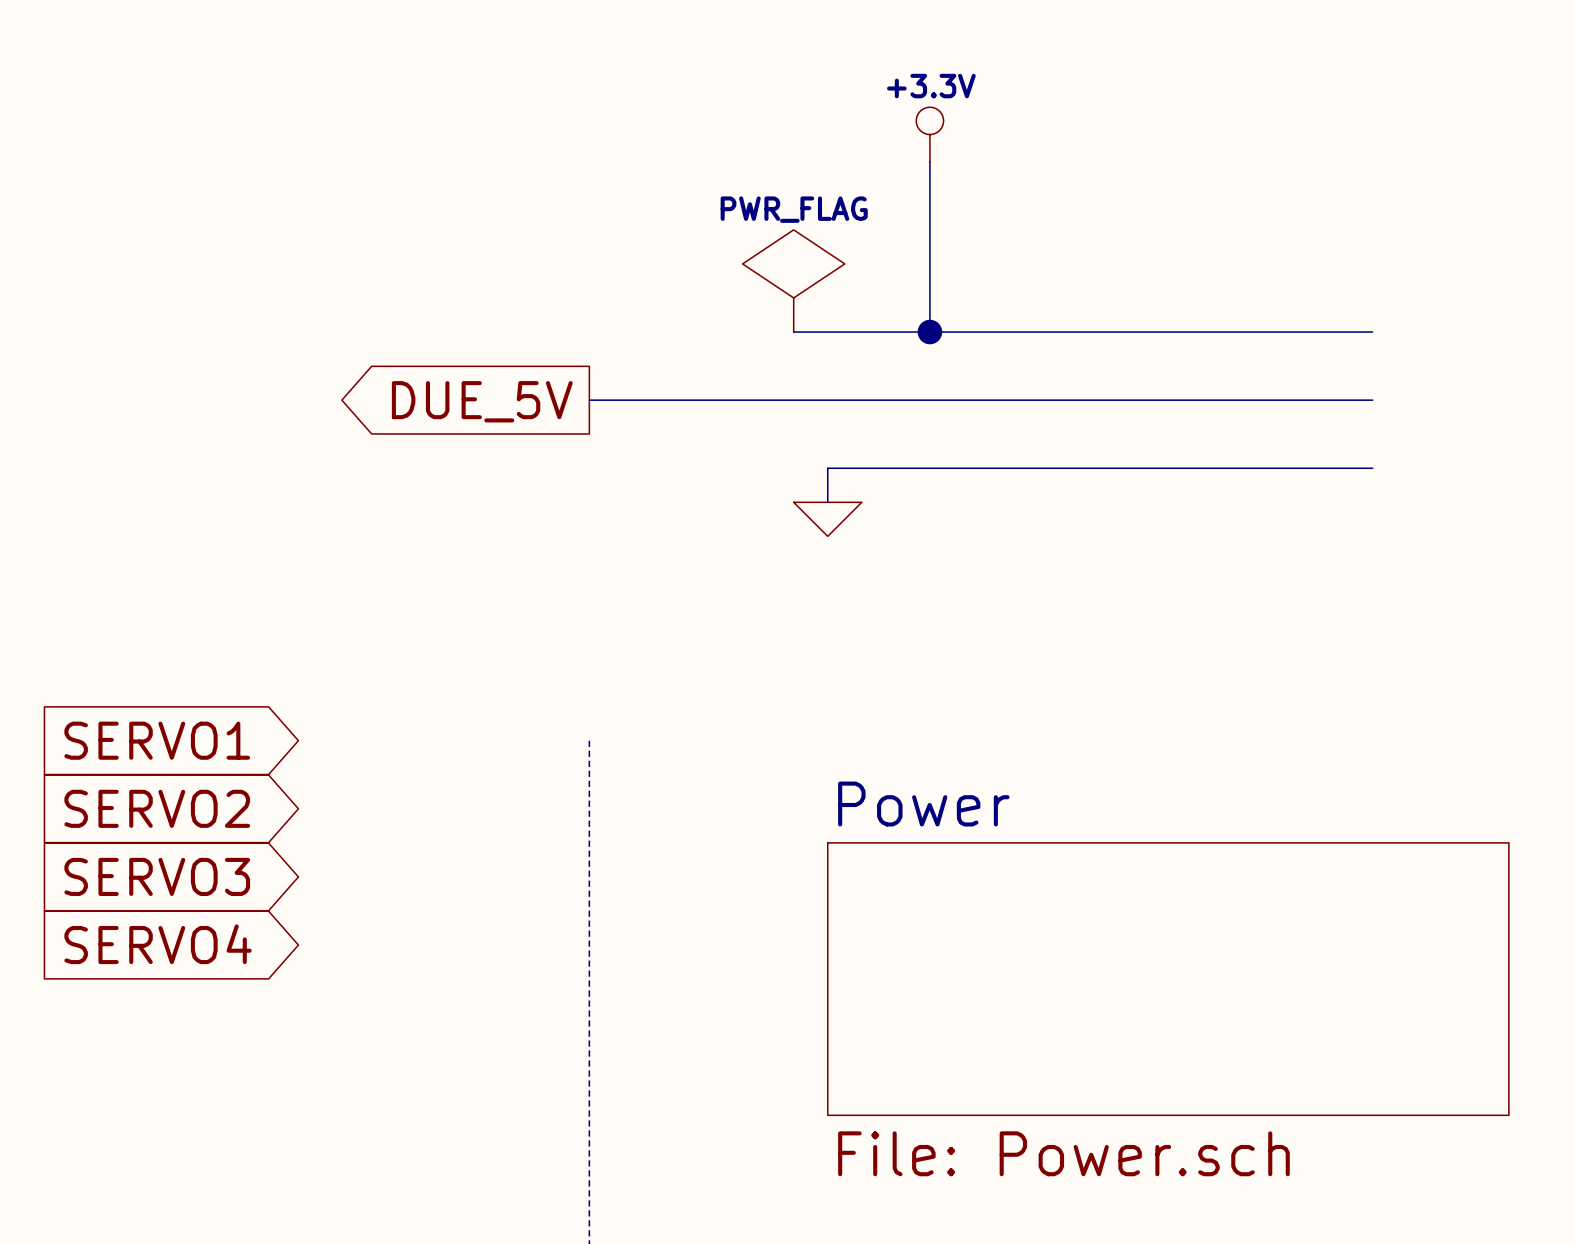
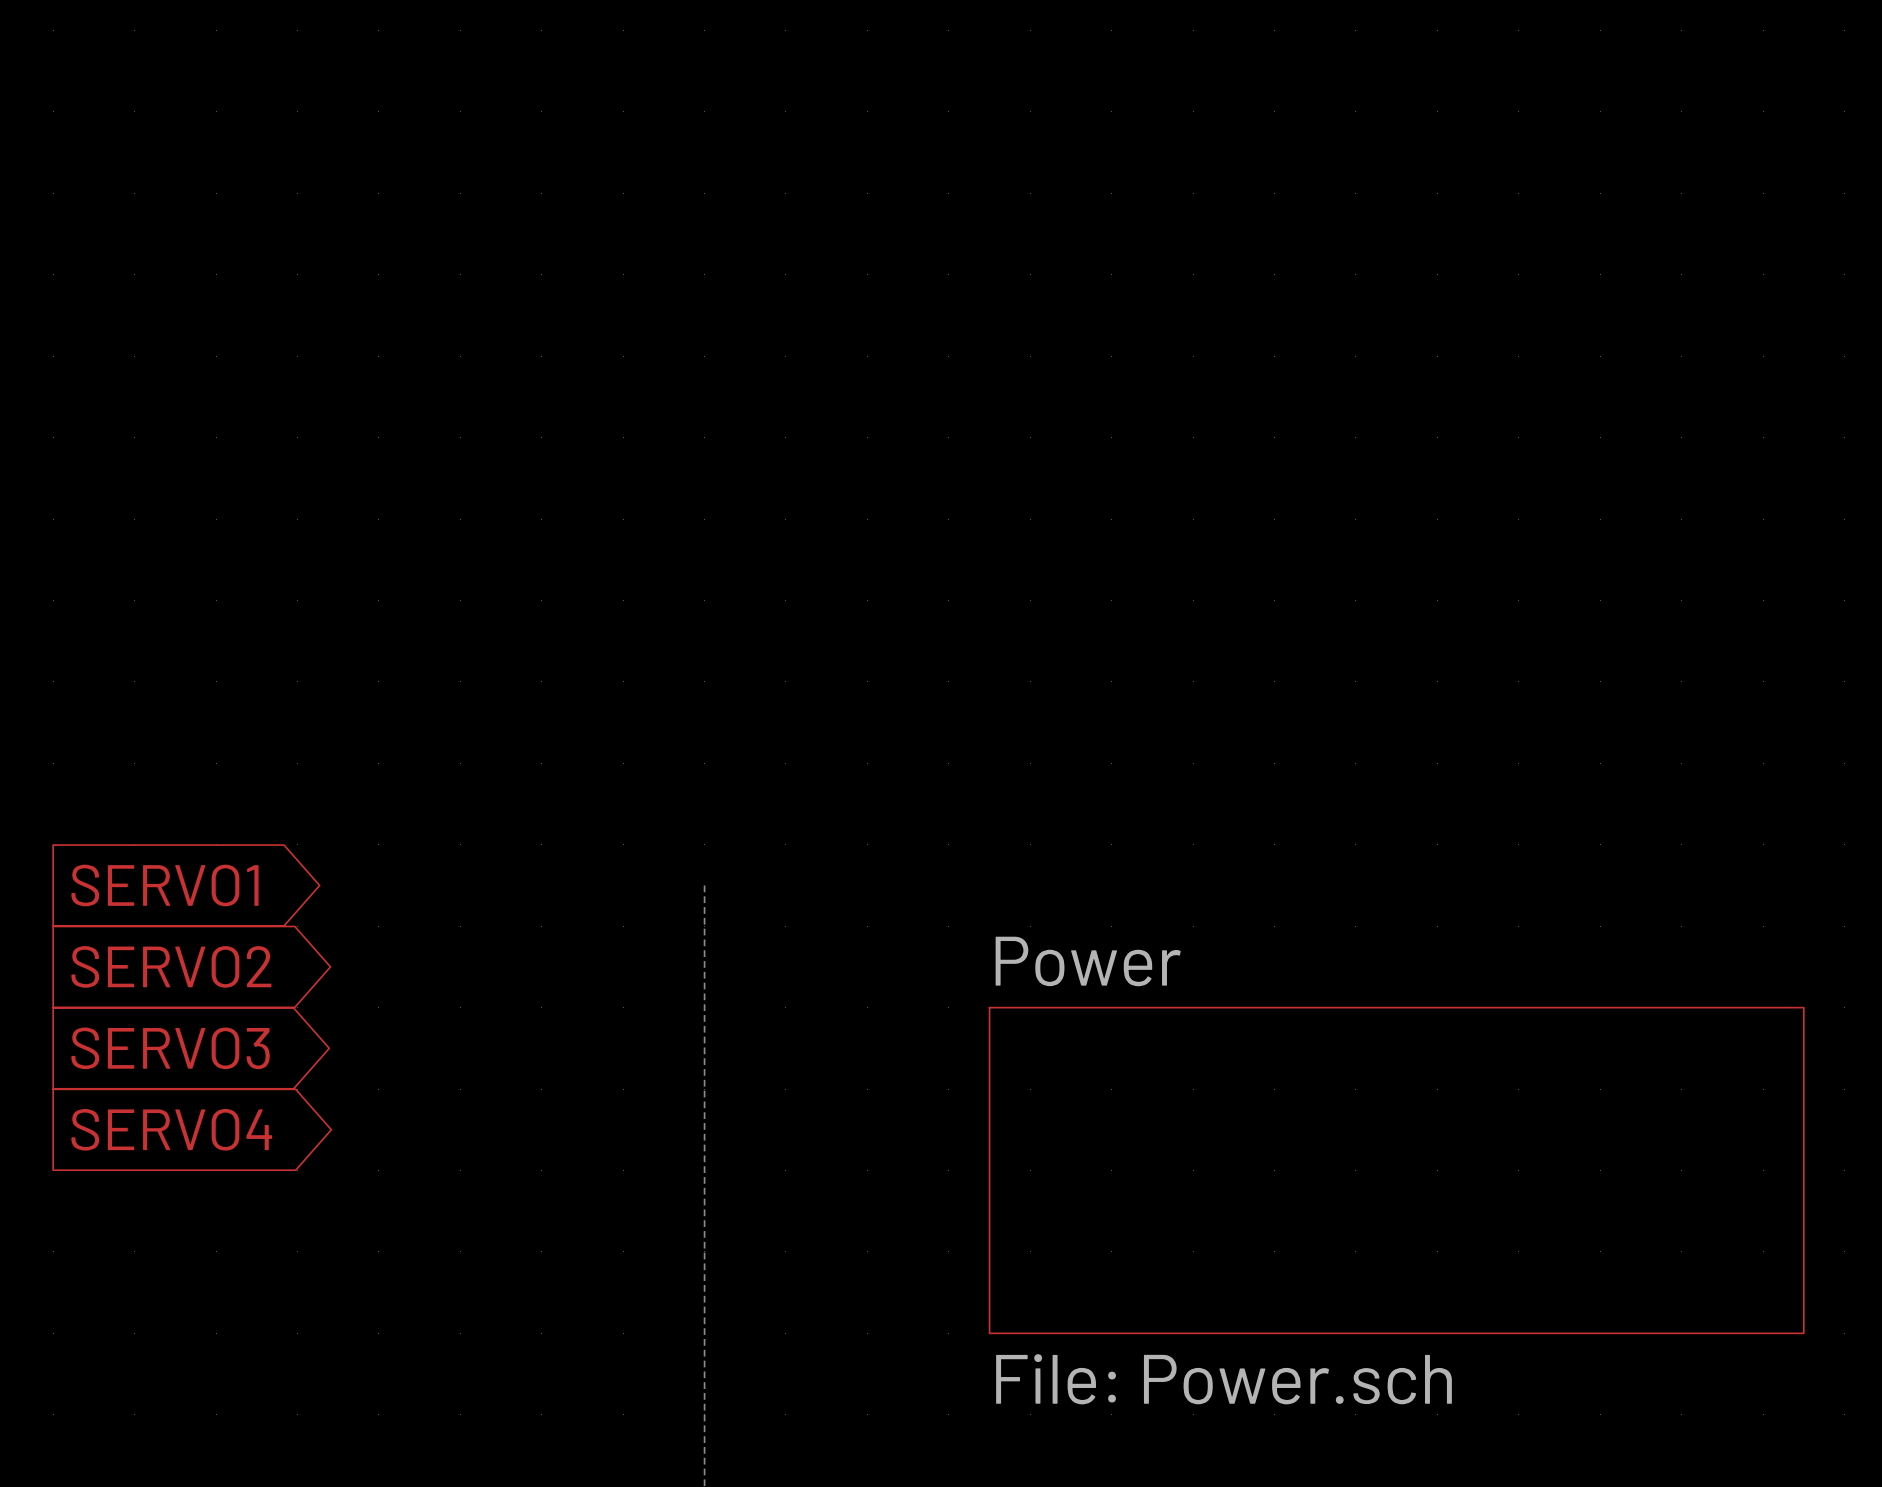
power symbol: +3.3V (929, 134) -> none
wire: (929, 161) (929, 332) -> none
power symbol: PWR_FLAG (793, 280) -> none
wire: (793, 332) (1372, 332) -> none
junction: (929, 332) -> none
wire: (589, 400) (1372, 400) -> none
global label: DUE_5V (482, 401) -> none
wire: (1372, 468) (827, 468) (827, 502) -> none
power symbol: (827, 519) -> none

